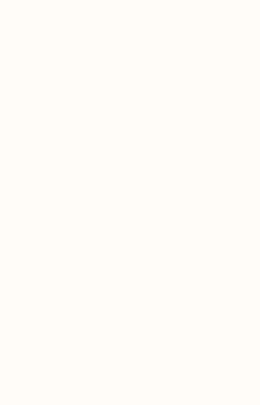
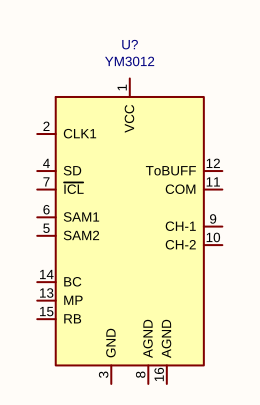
U?: none -> YM3012 (129, 231)

